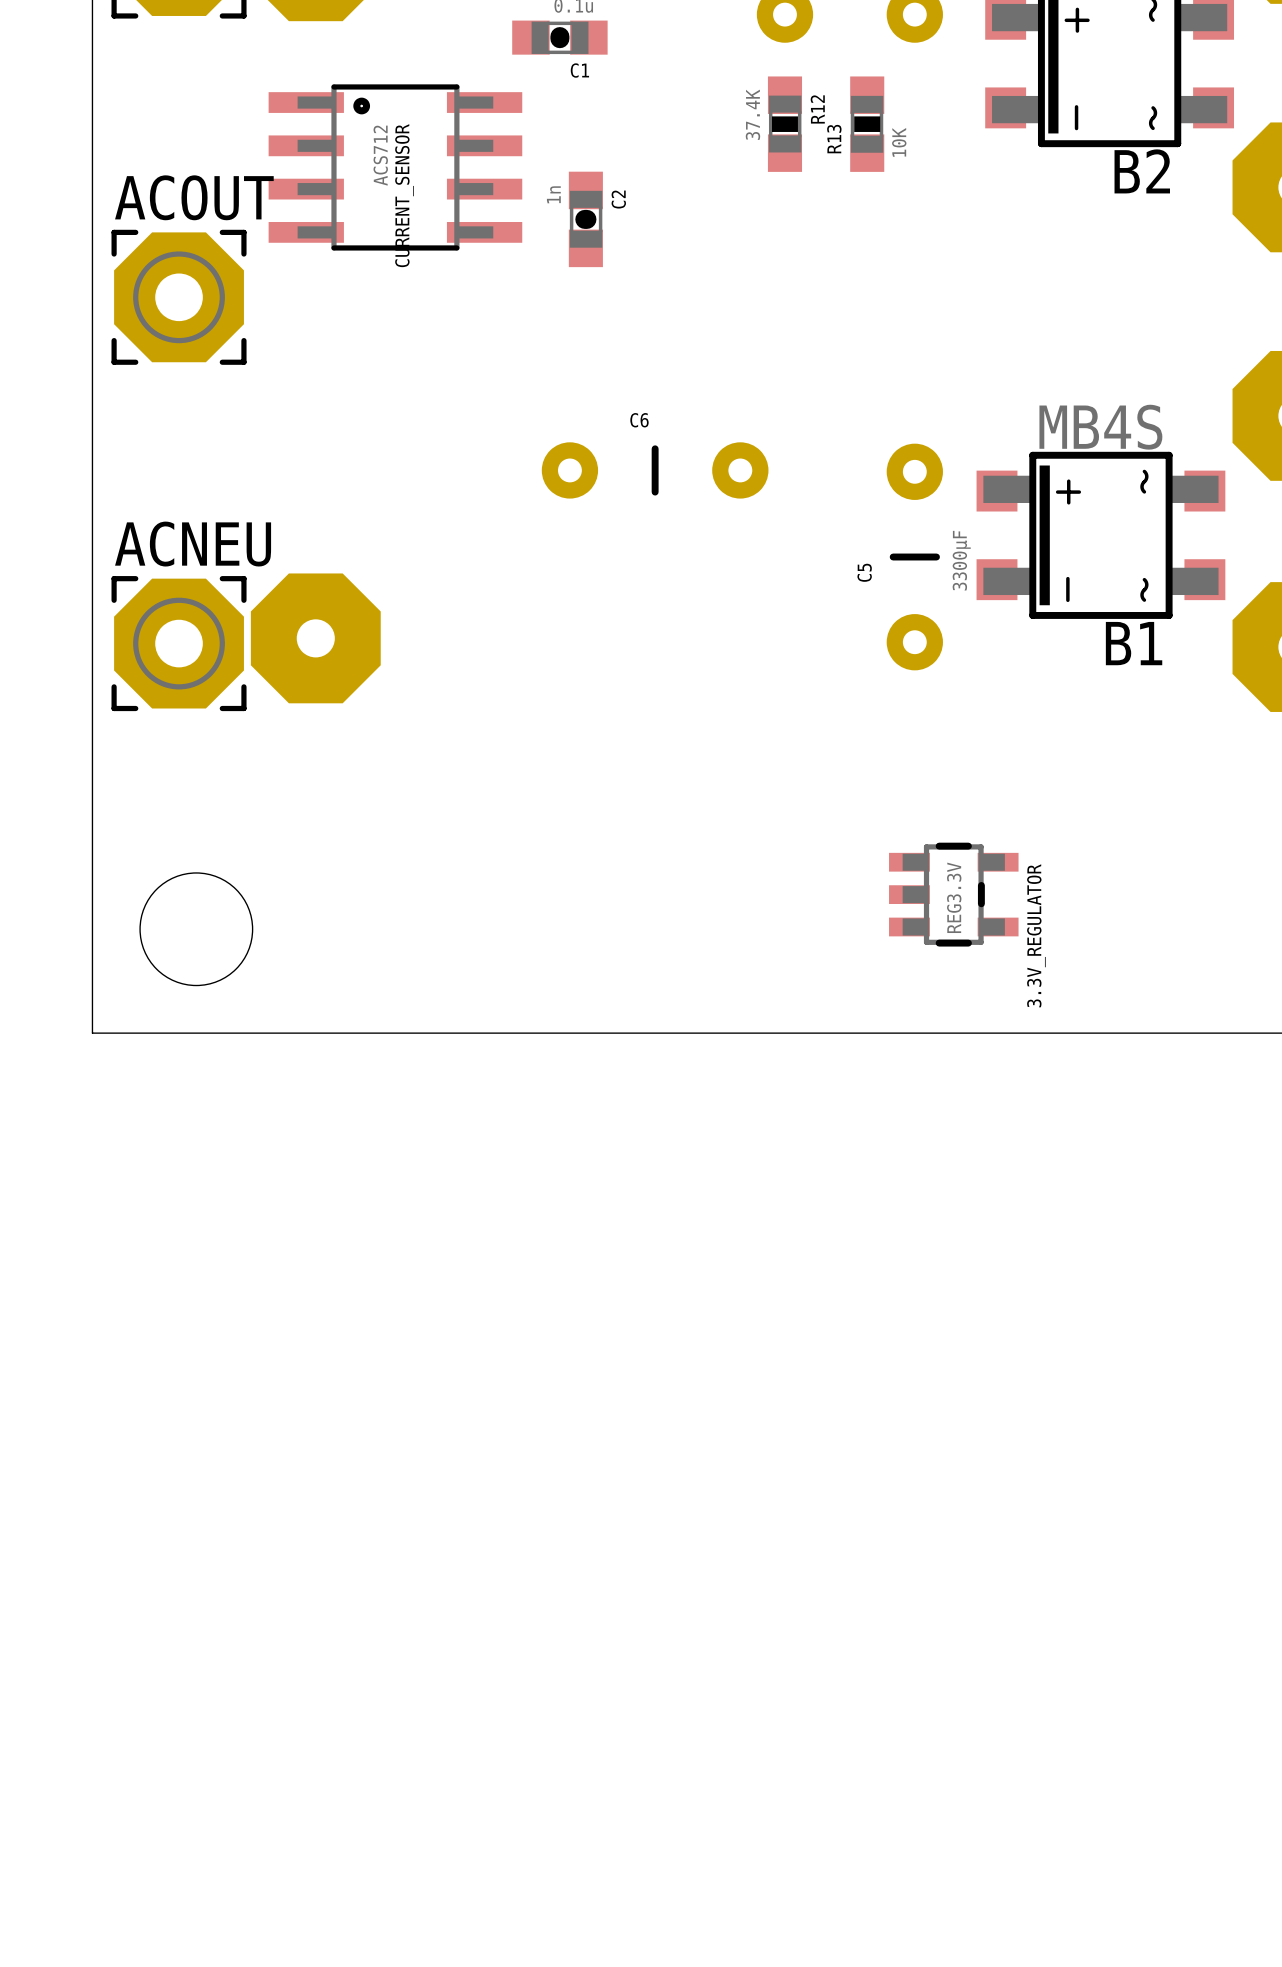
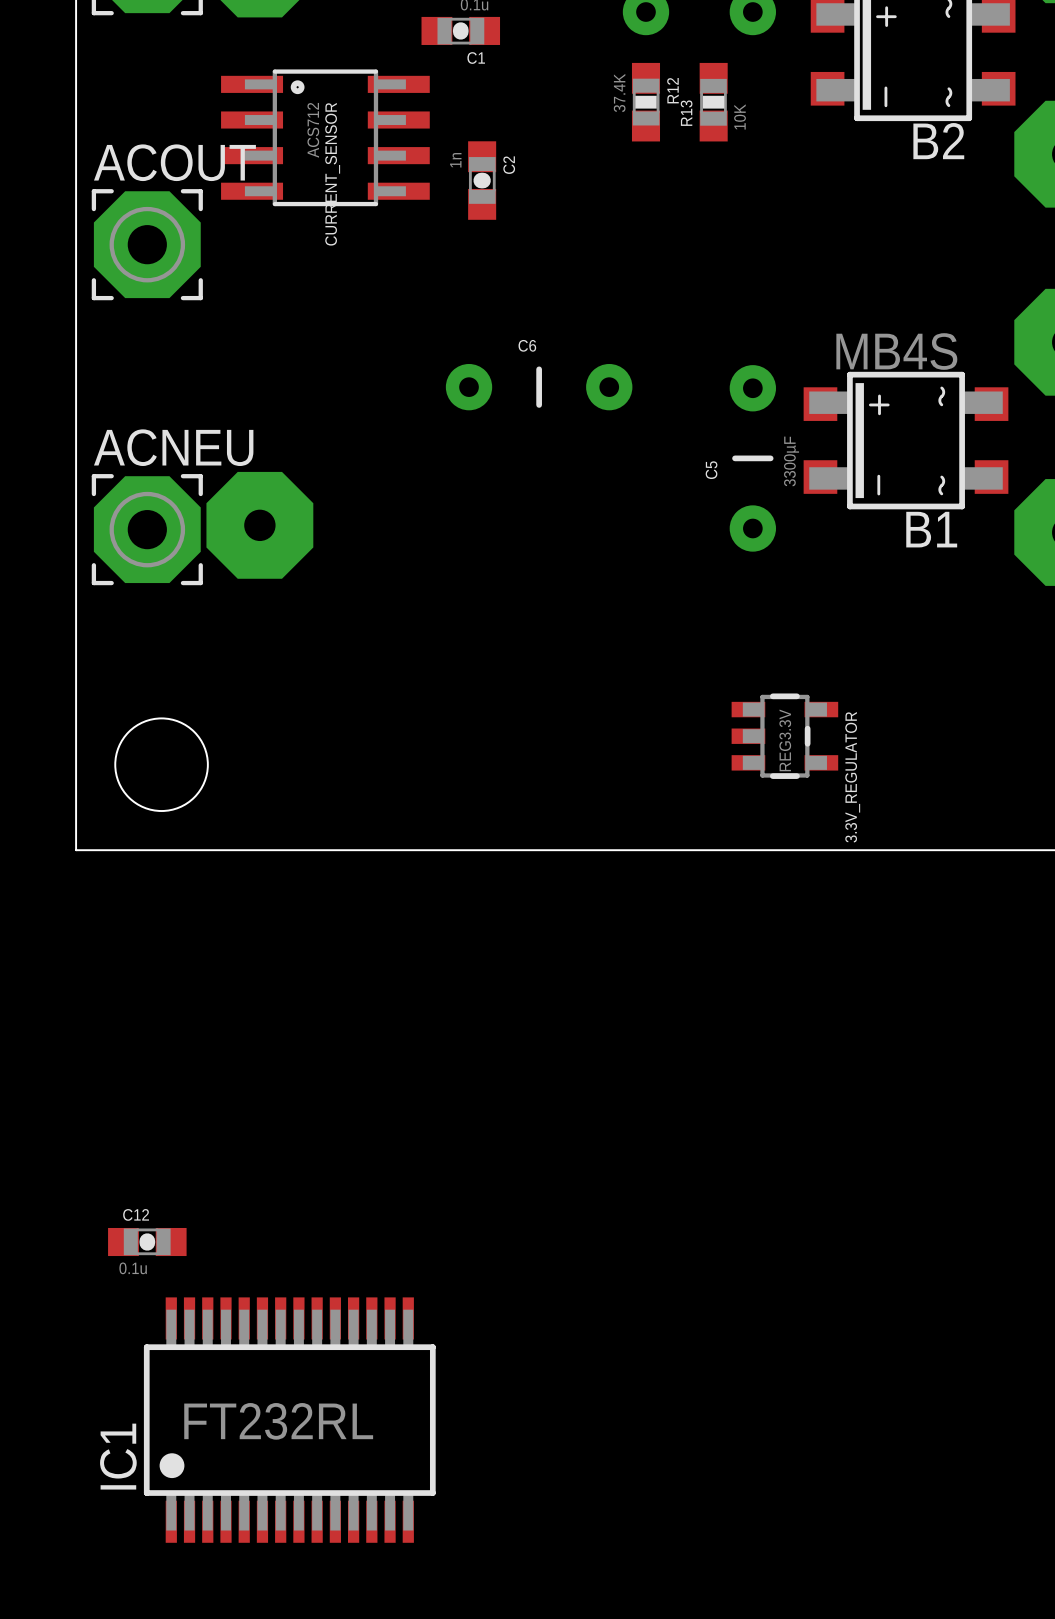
C12: none -> 0.1u (147, 1242)
IC1: none -> FT232RL (289, 1420)

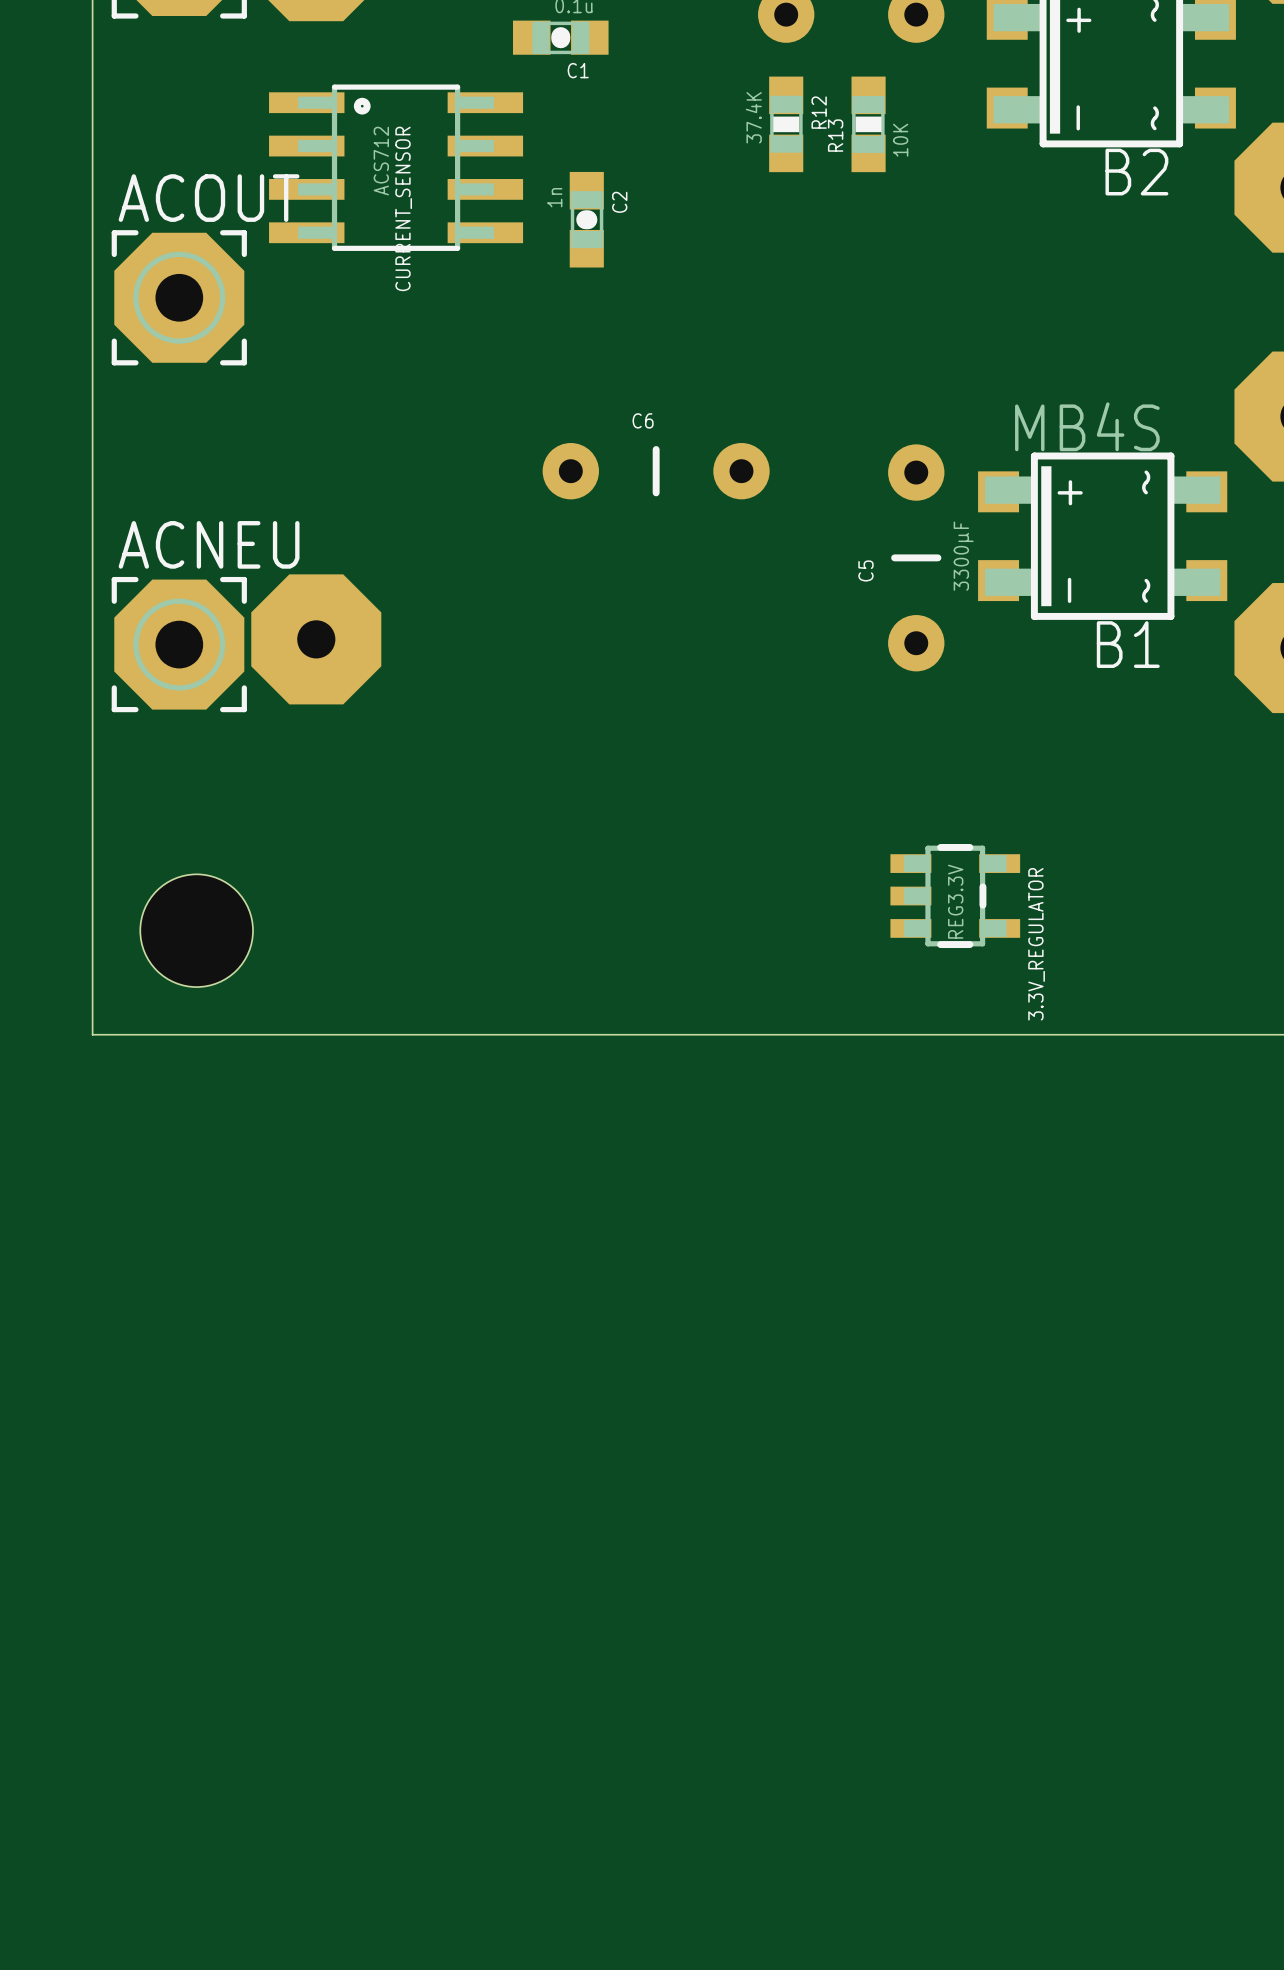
C12: 0.1u (147, 1242) -> none
IC1: FT232RL (289, 1420) -> none

